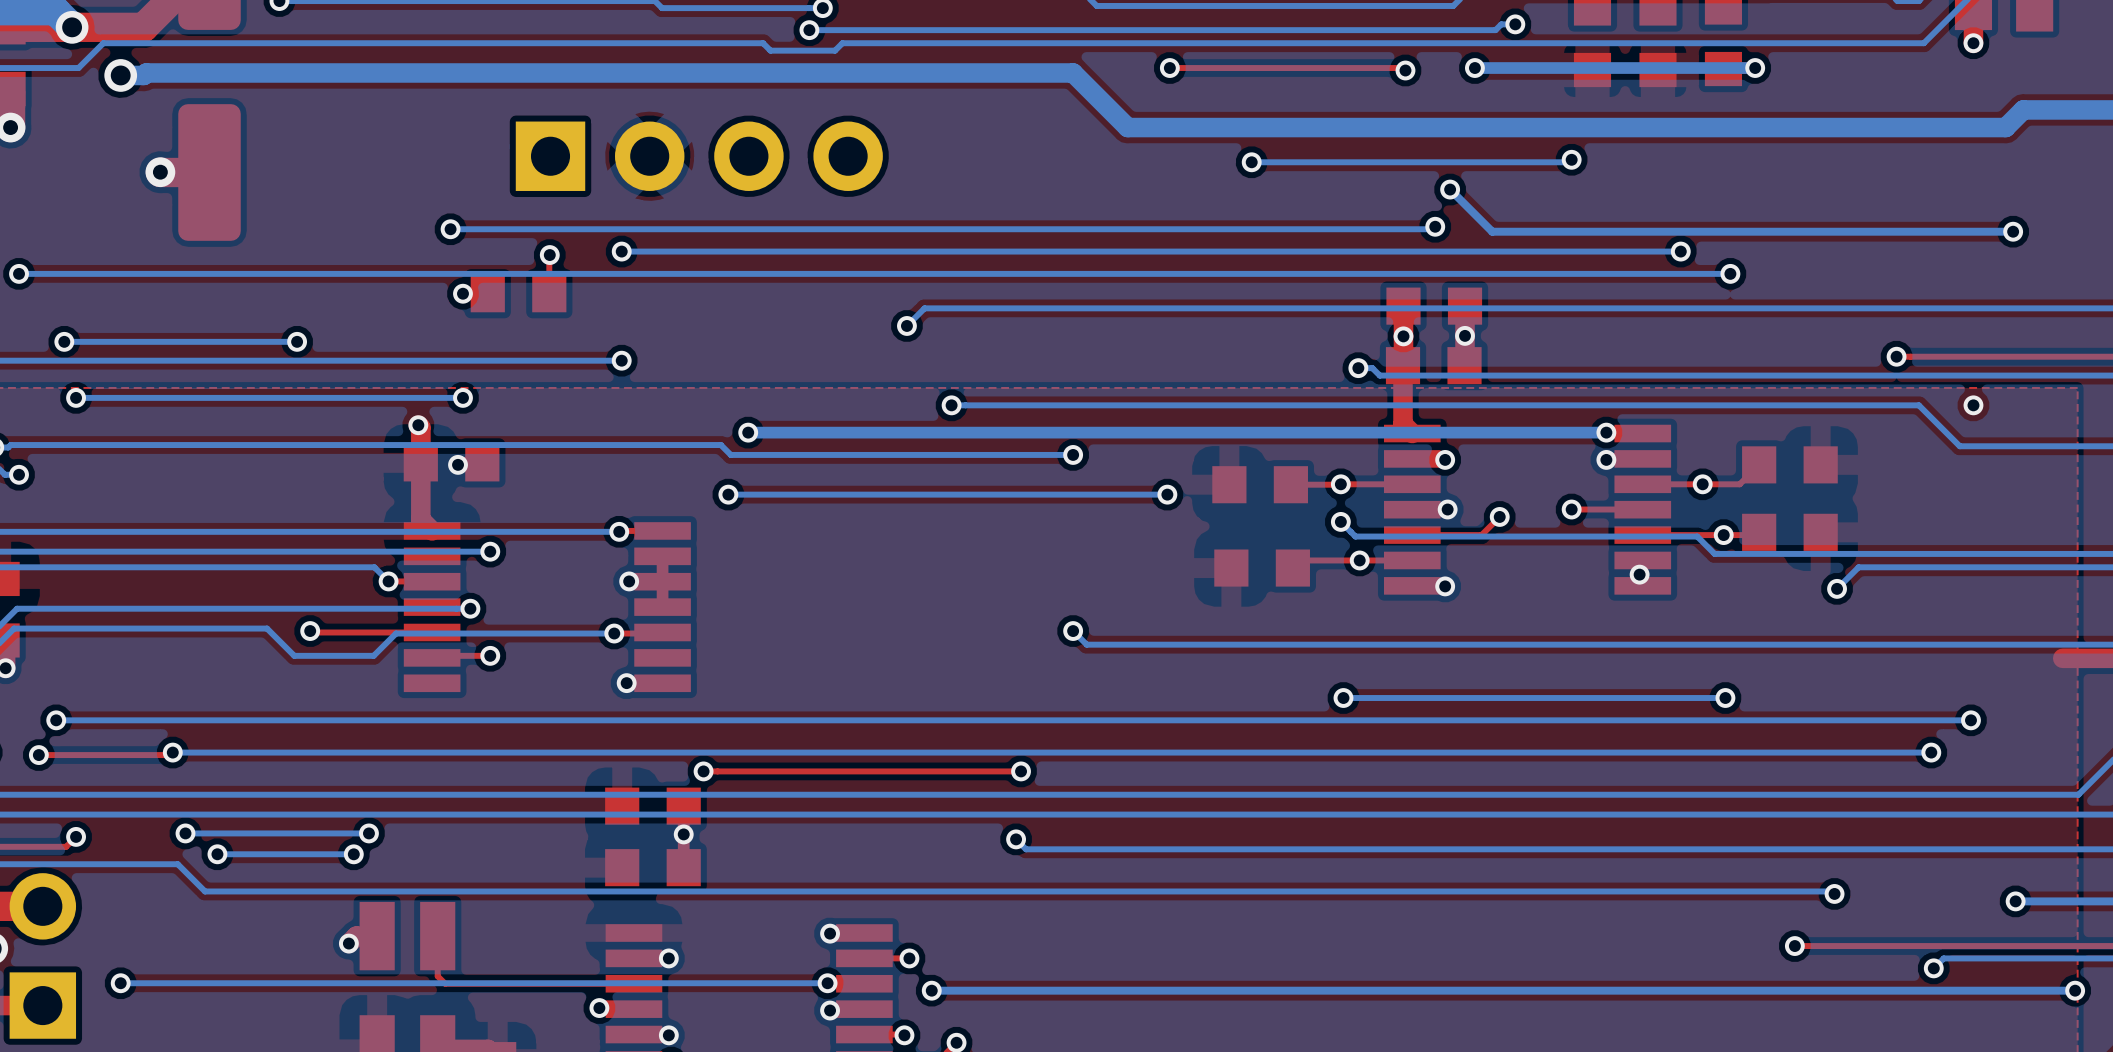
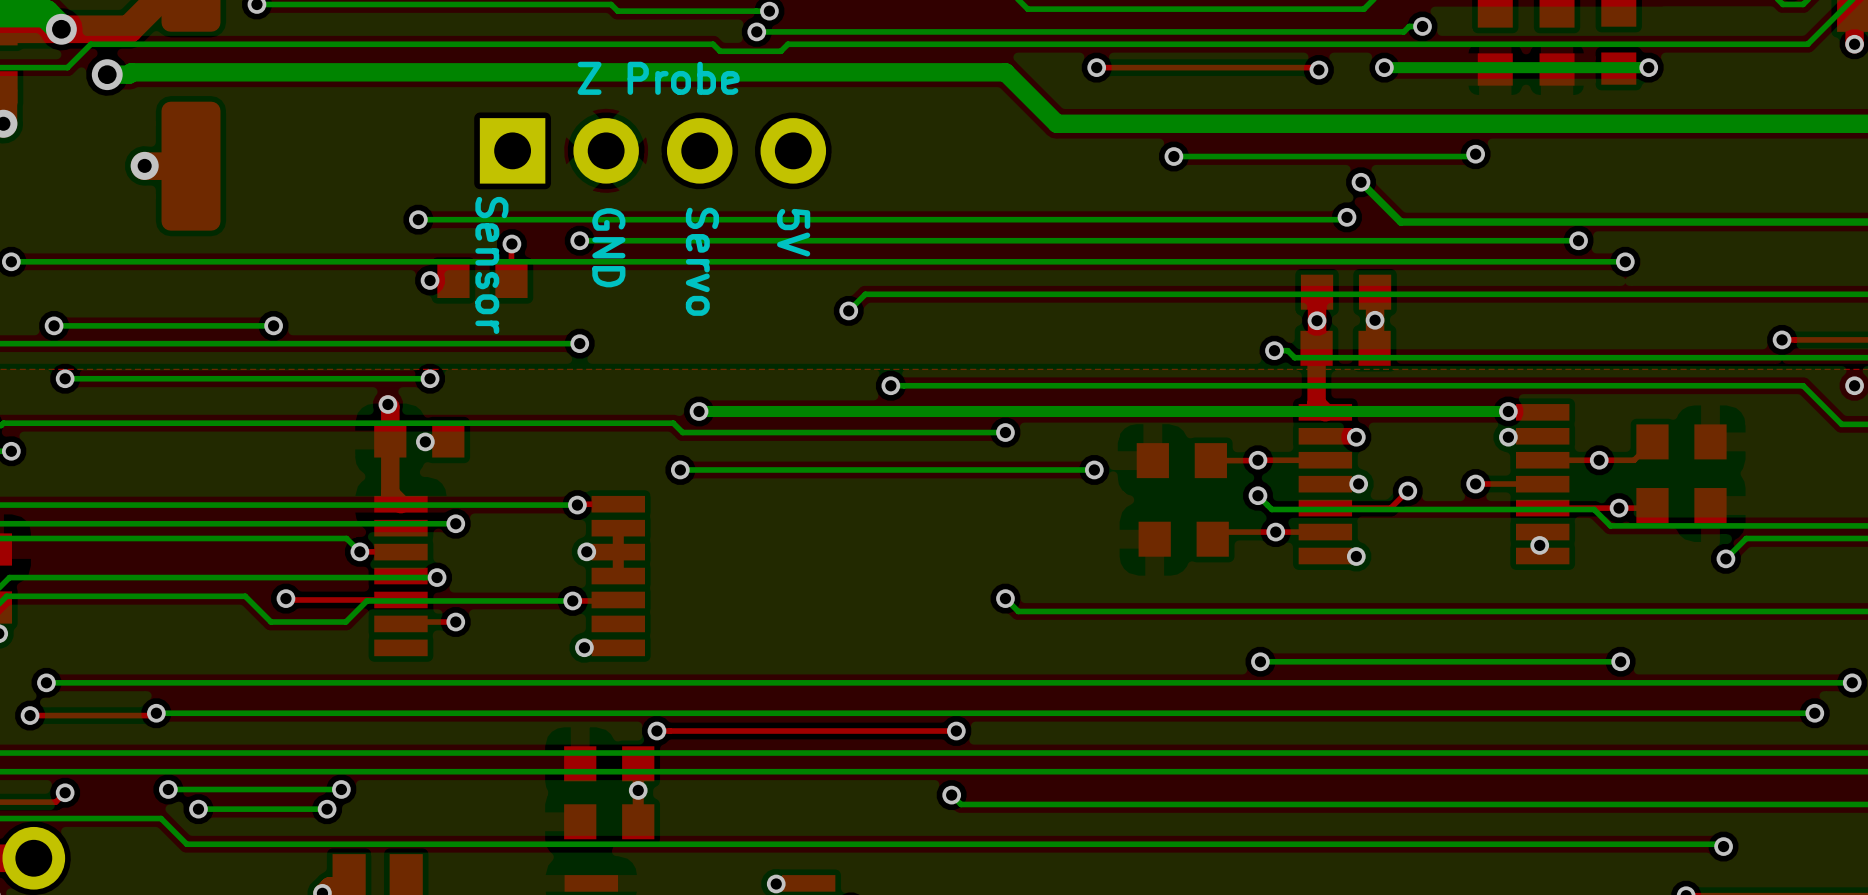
text: none -> Z Probe (658, 78)
text: none -> 5V (793, 232)
text: none -> GND (608, 247)
text: none -> Servo (702, 261)
text: none -> Sensor (491, 265)

